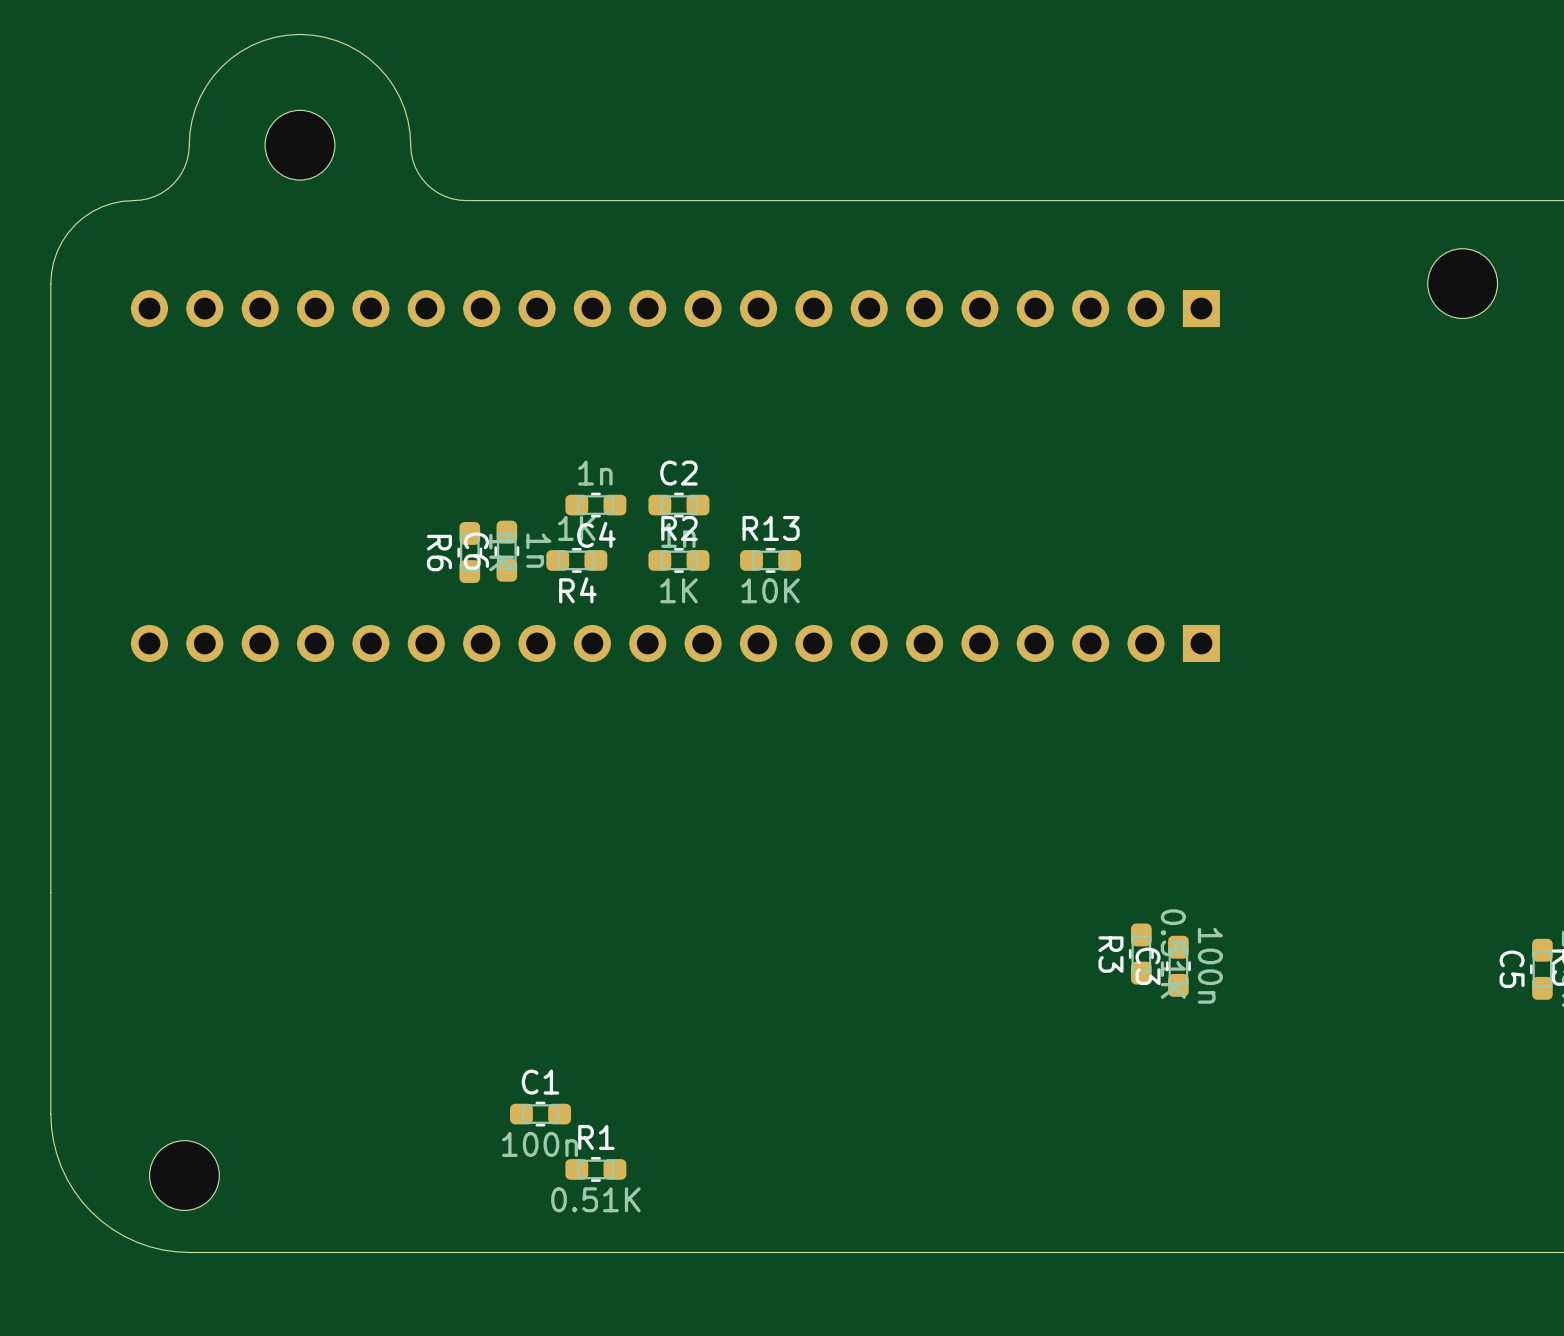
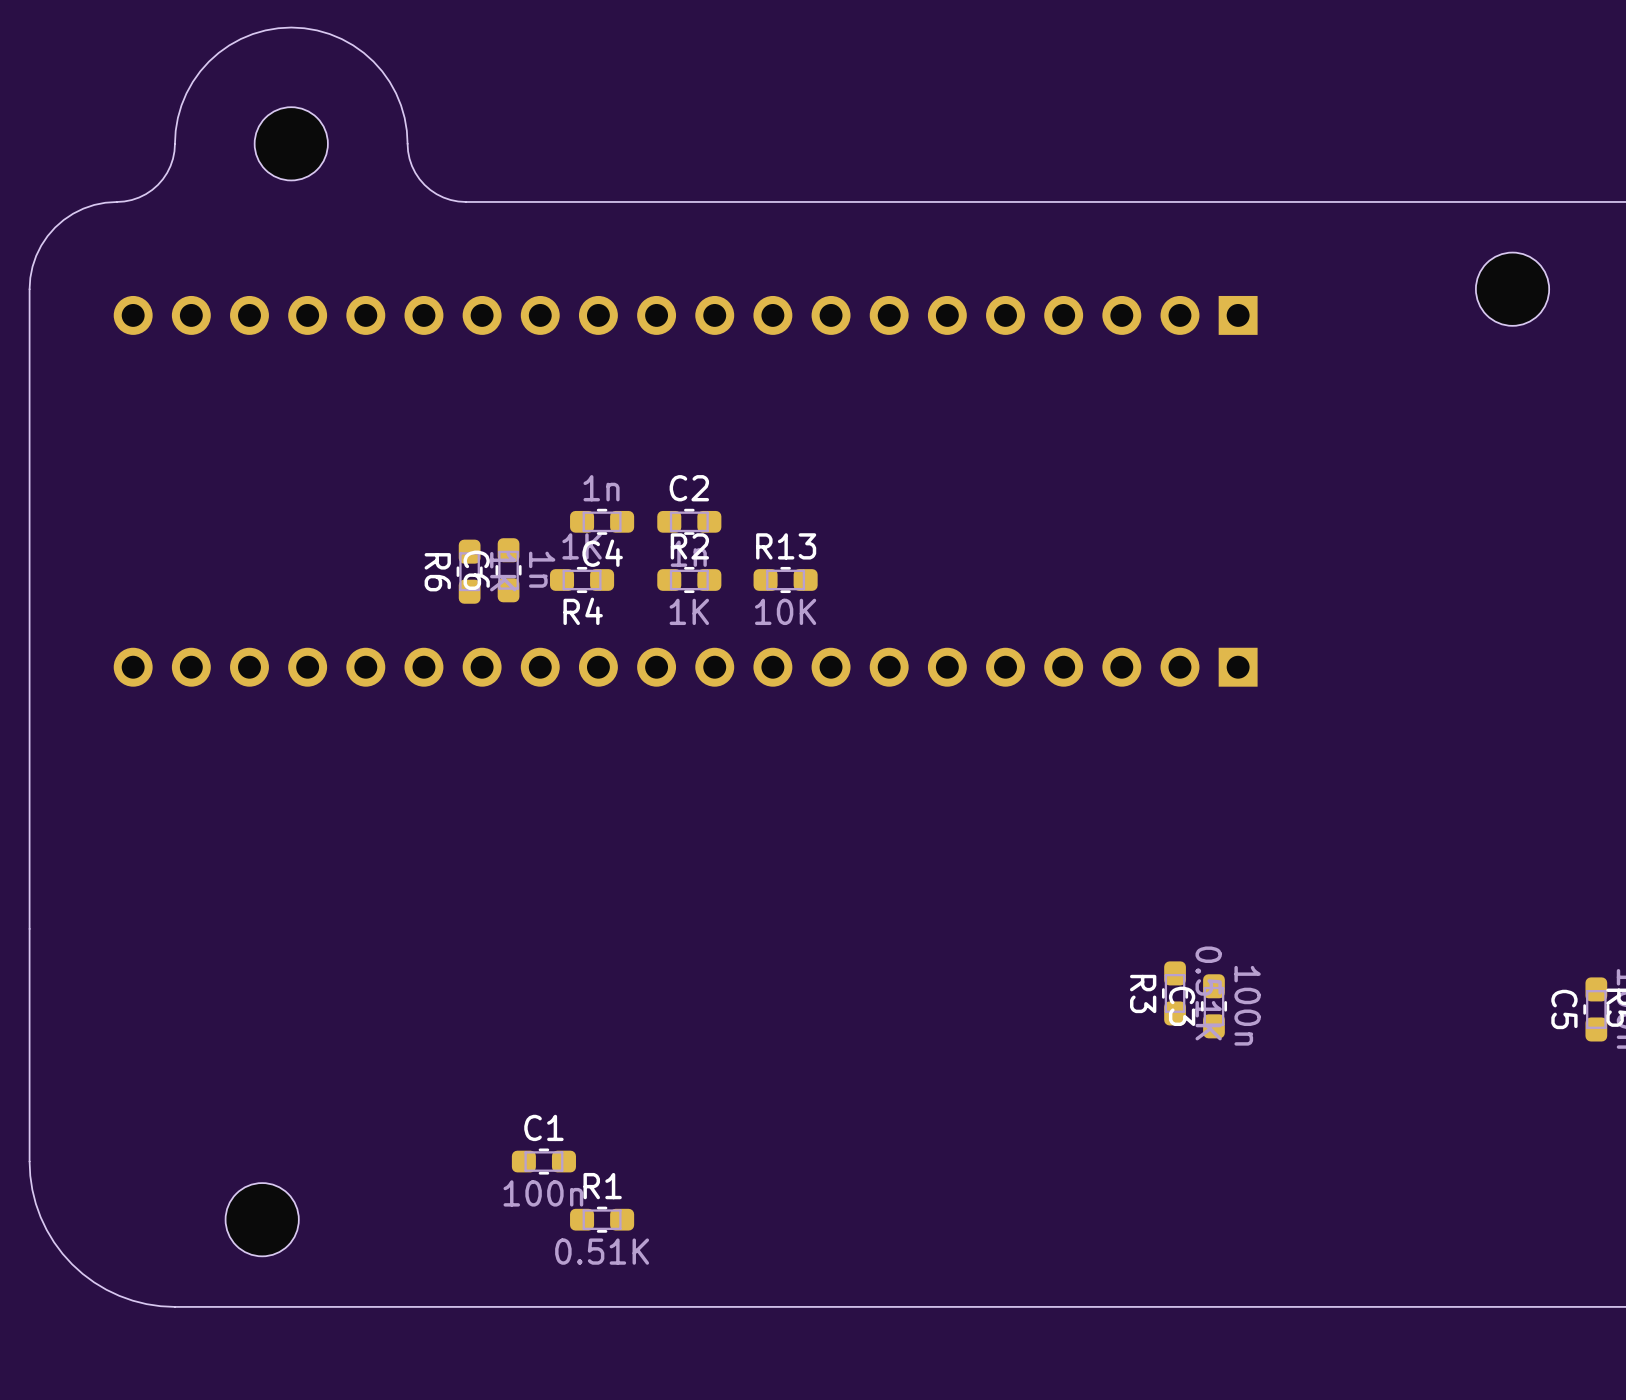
part position: (184, 1175) -> (262, 1219)

